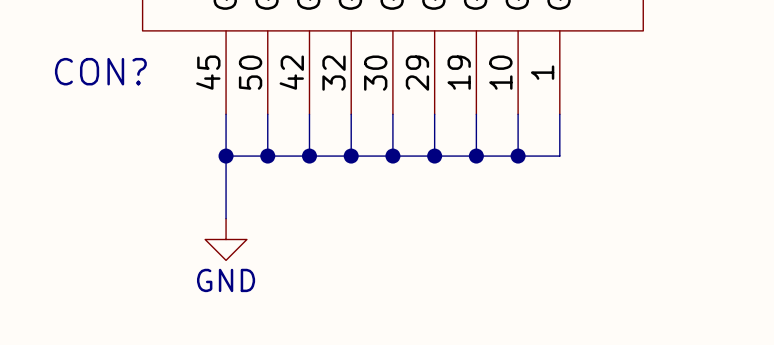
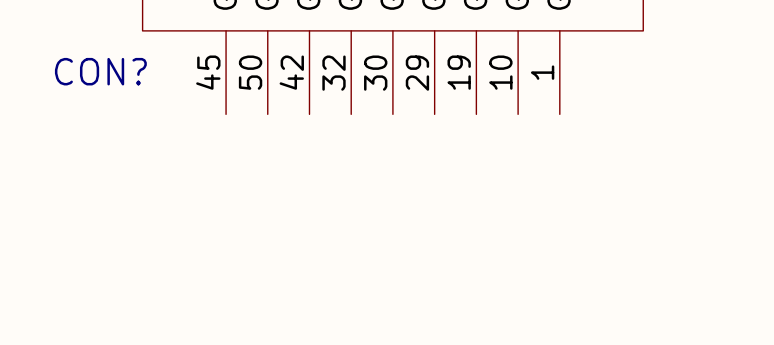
wire: (226, 114) (226, 218) -> none
wire: (267, 114) (267, 156) -> none
wire: (309, 114) (309, 156) -> none
wire: (351, 114) (351, 156) -> none
wire: (392, 114) (392, 156) -> none
wire: (434, 114) (434, 156) -> none
wire: (476, 114) (476, 156) -> none
wire: (518, 114) (518, 156) -> none
wire: (559, 114) (559, 156) (226, 156) -> none
junction: (226, 156) -> none
junction: (267, 156) -> none
junction: (309, 156) -> none
junction: (351, 156) -> none
junction: (392, 156) -> none
junction: (434, 156) -> none
junction: (476, 156) -> none
junction: (518, 156) -> none
power symbol: GND (226, 239) -> none

